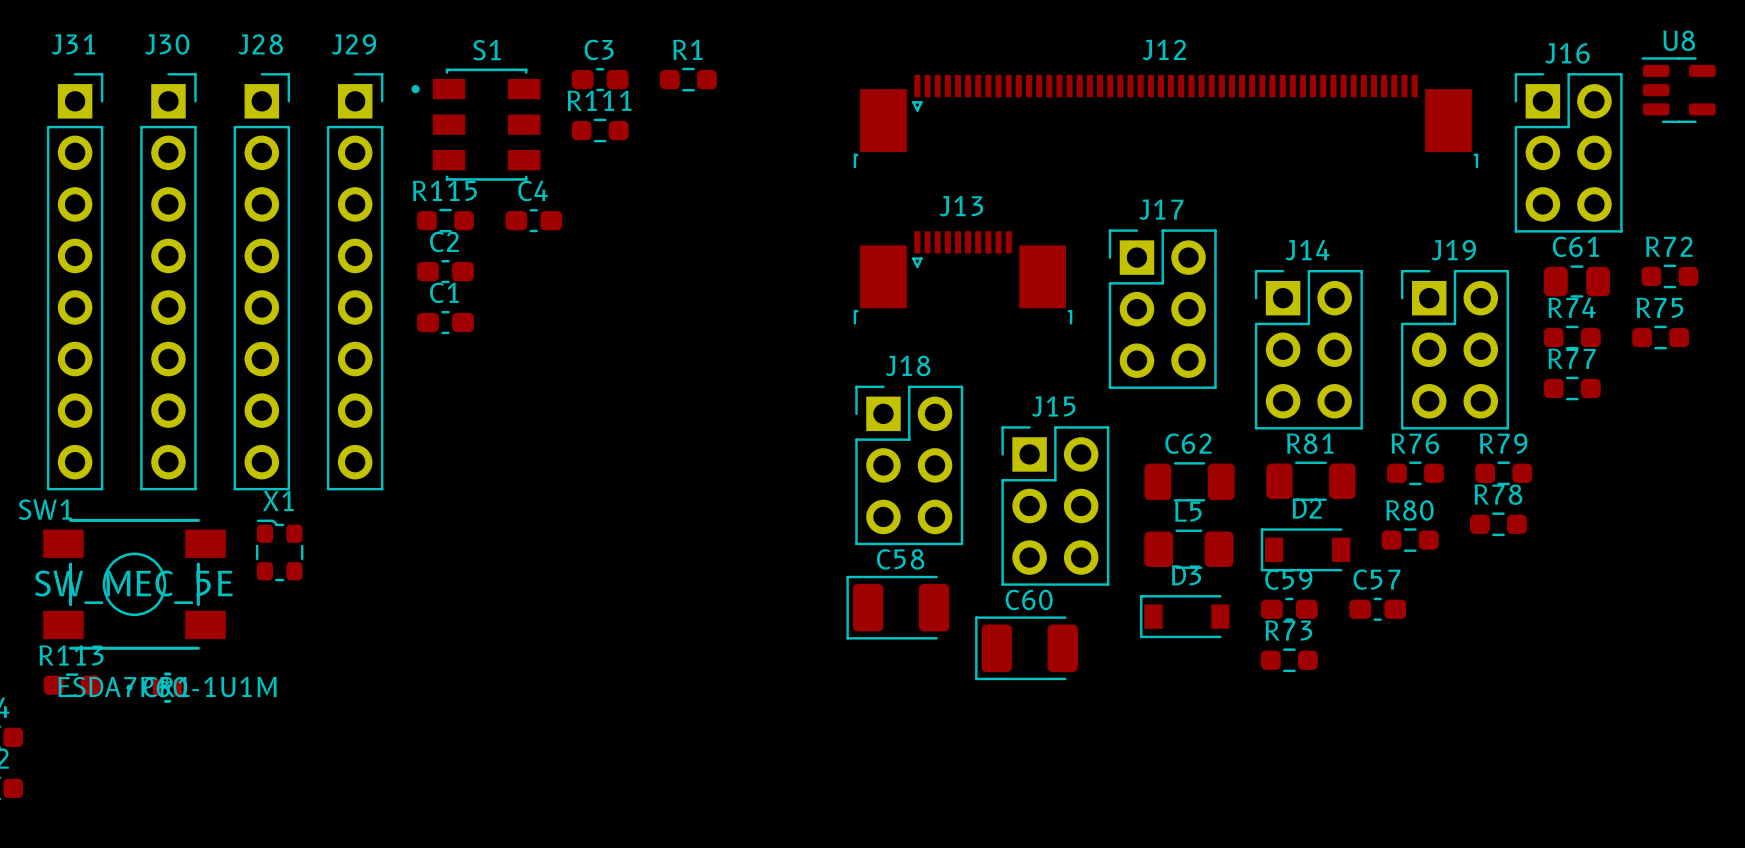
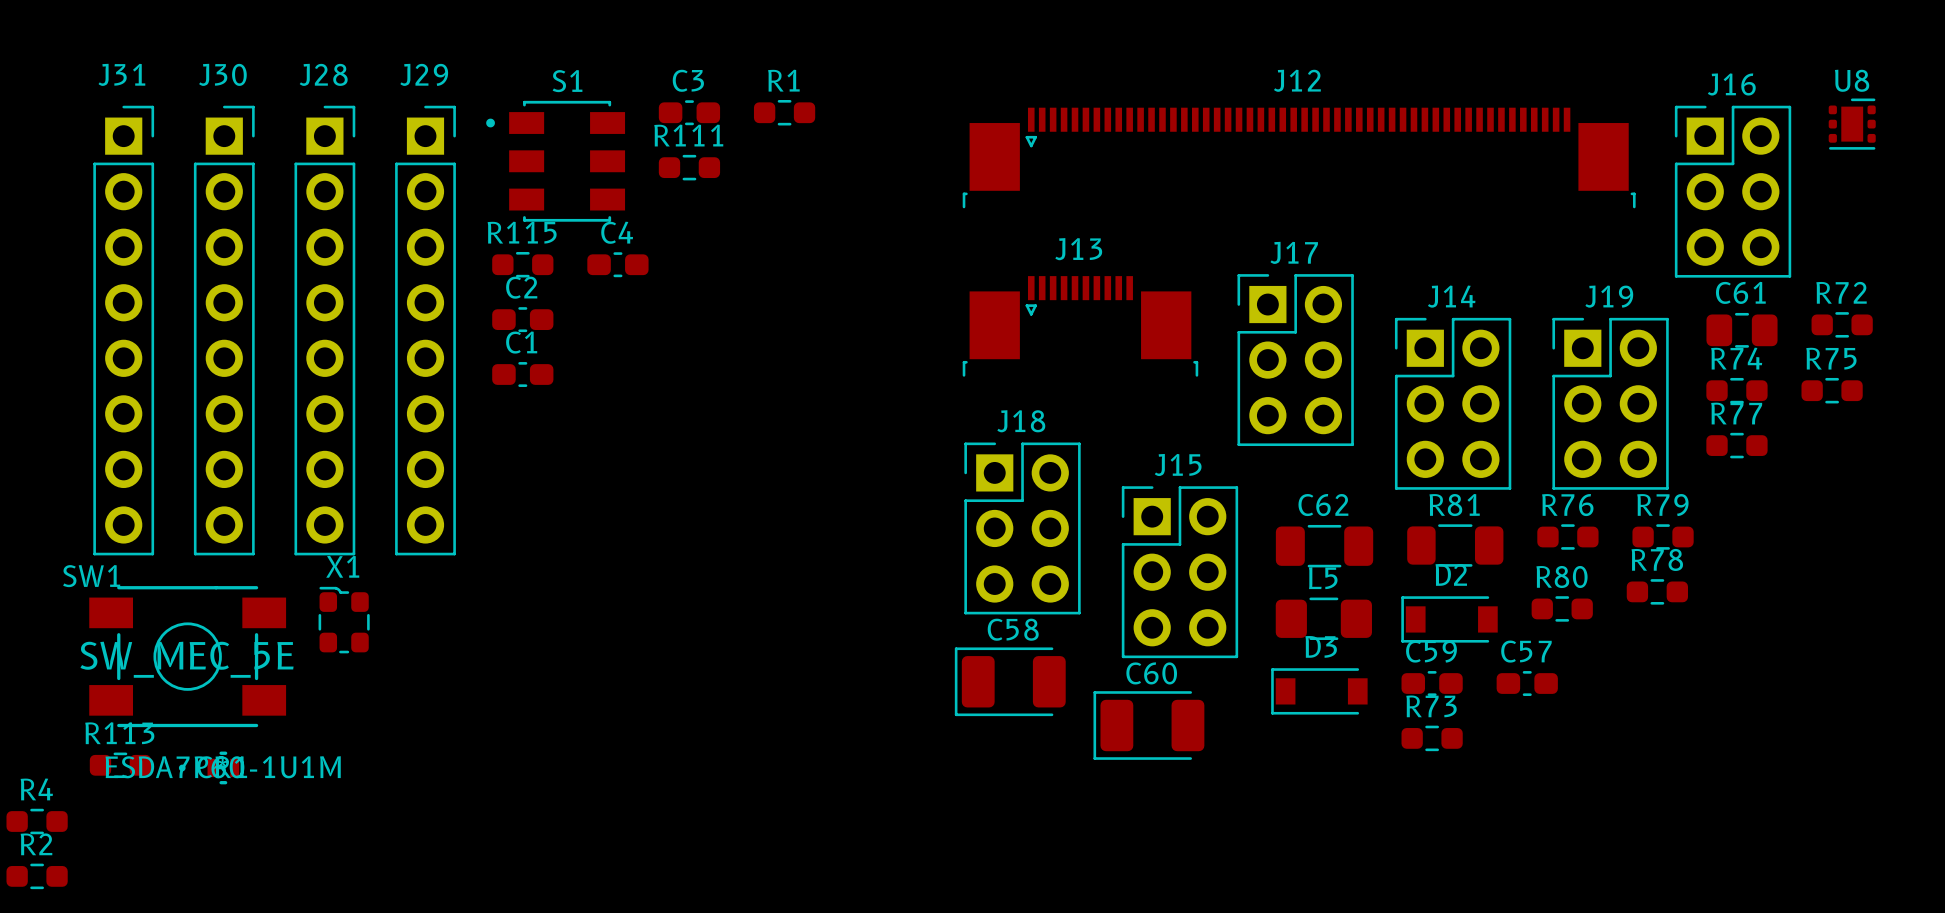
U8 footprint: [1641, 57, 1716, 124] -> [1828, 98, 1876, 150]

